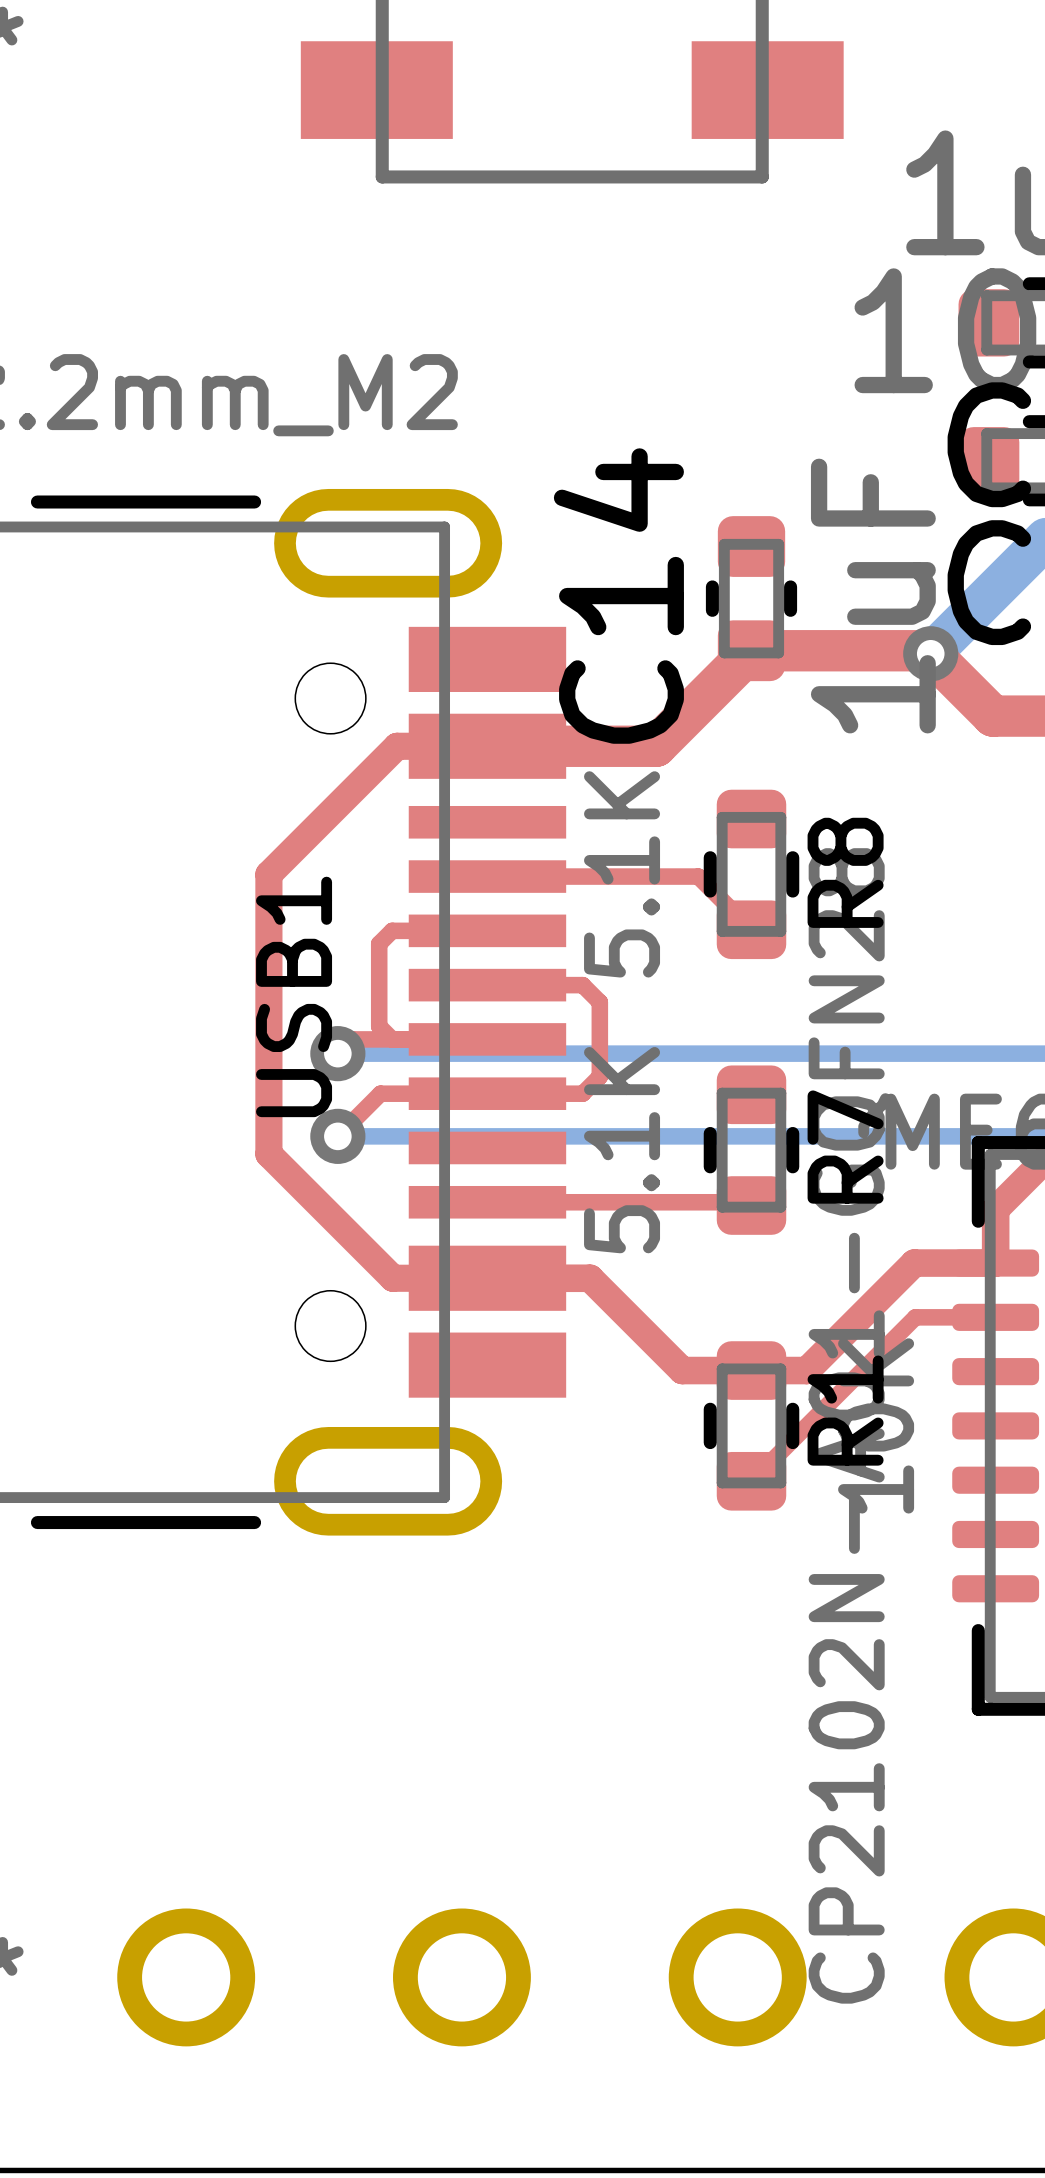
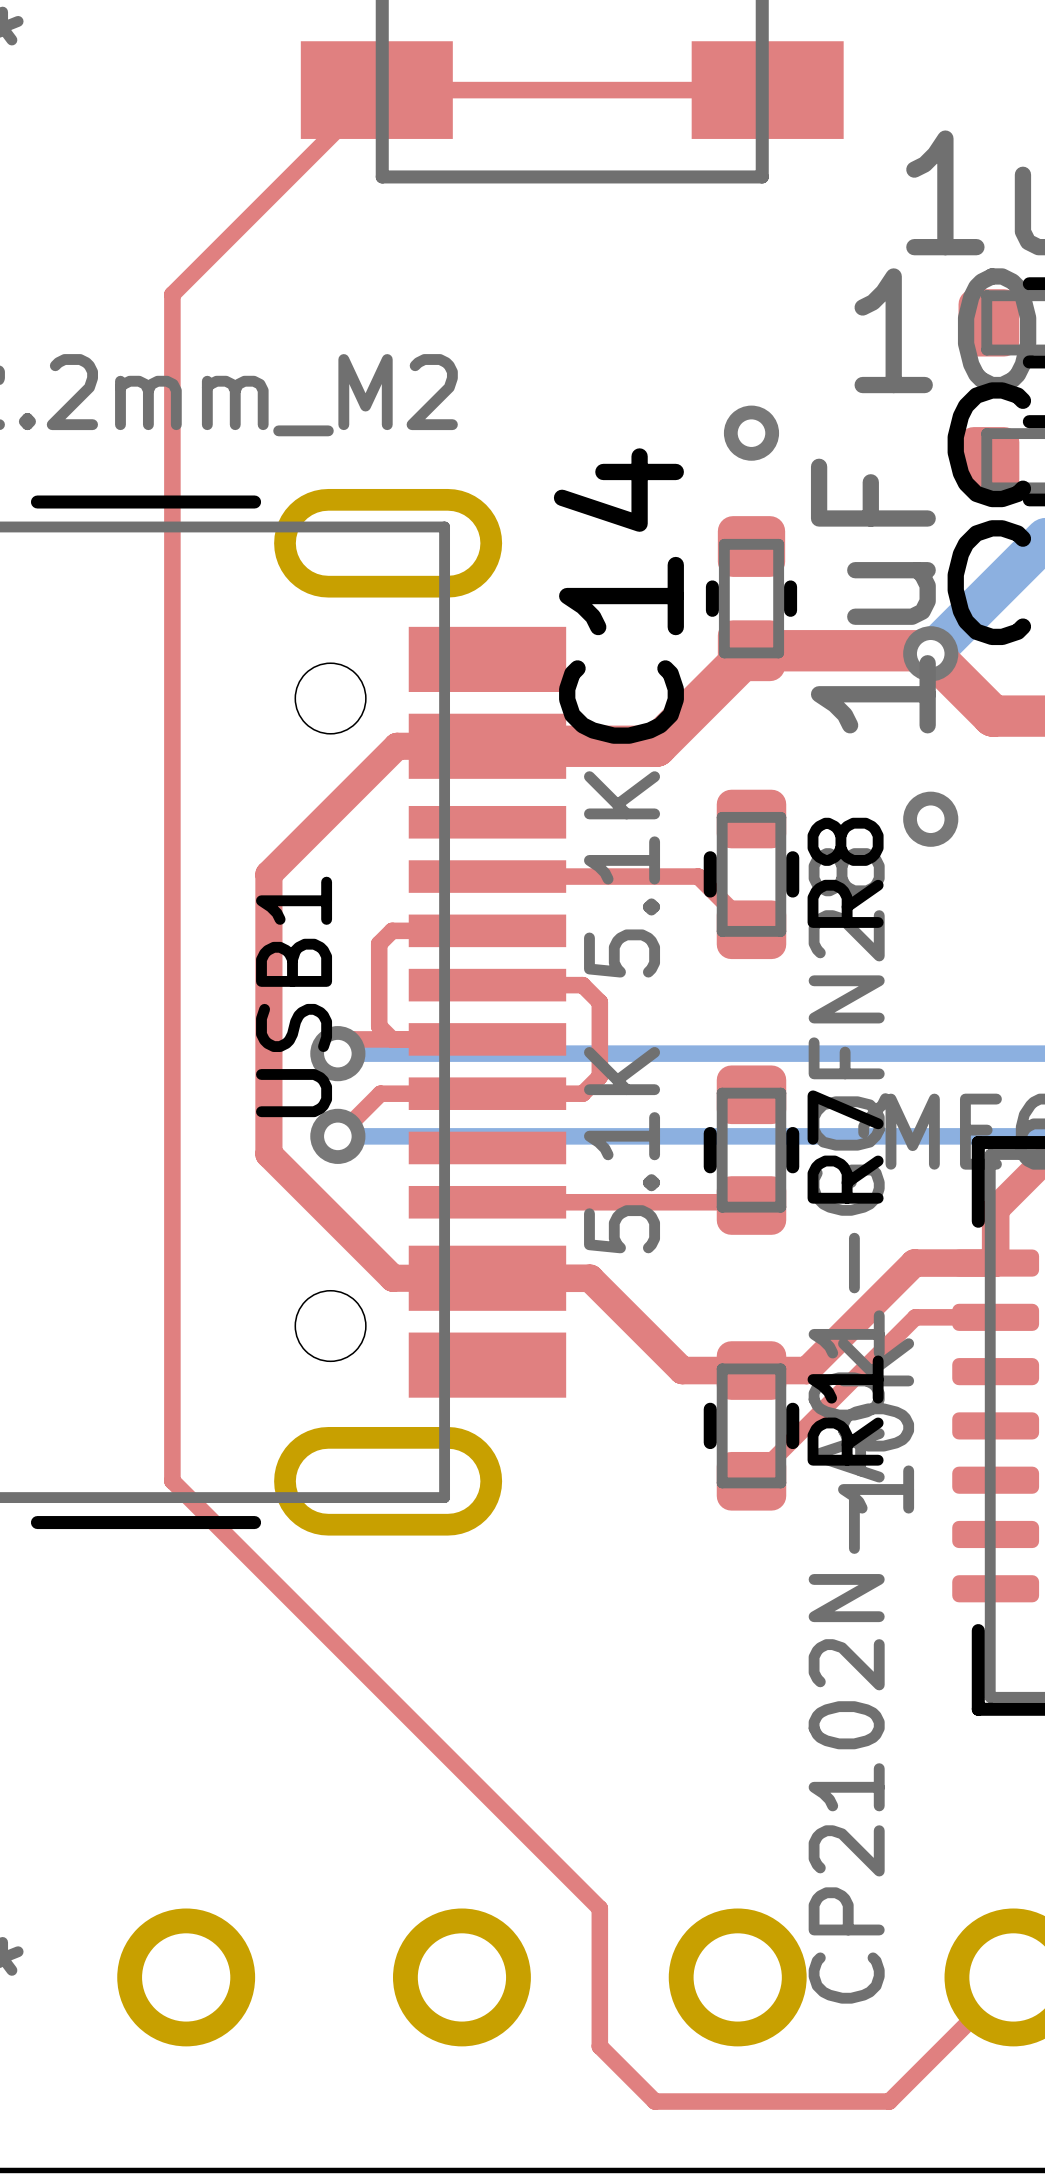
top track: none -> (767, 90) (376, 90) (172, 294) (172, 1481) (599, 1908) (599, 2046) (654, 2101) (889, 2101) (1013, 1977)
via: none -> (751, 433)
via: none -> (930, 819)

